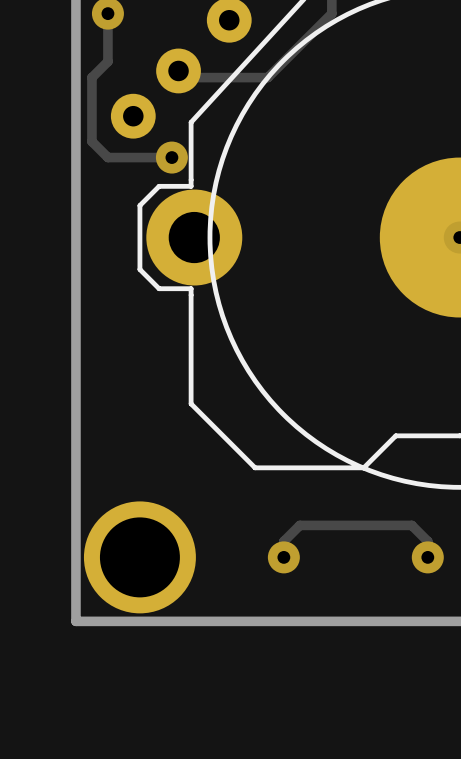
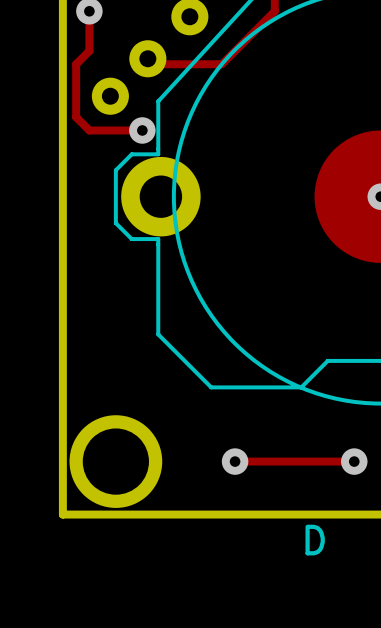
track: (283, 557) (283, 541) (299, 525) (411, 525) (427, 541) (427, 557) -> (235, 461) (354, 461)
text: none -> D (315, 540)

